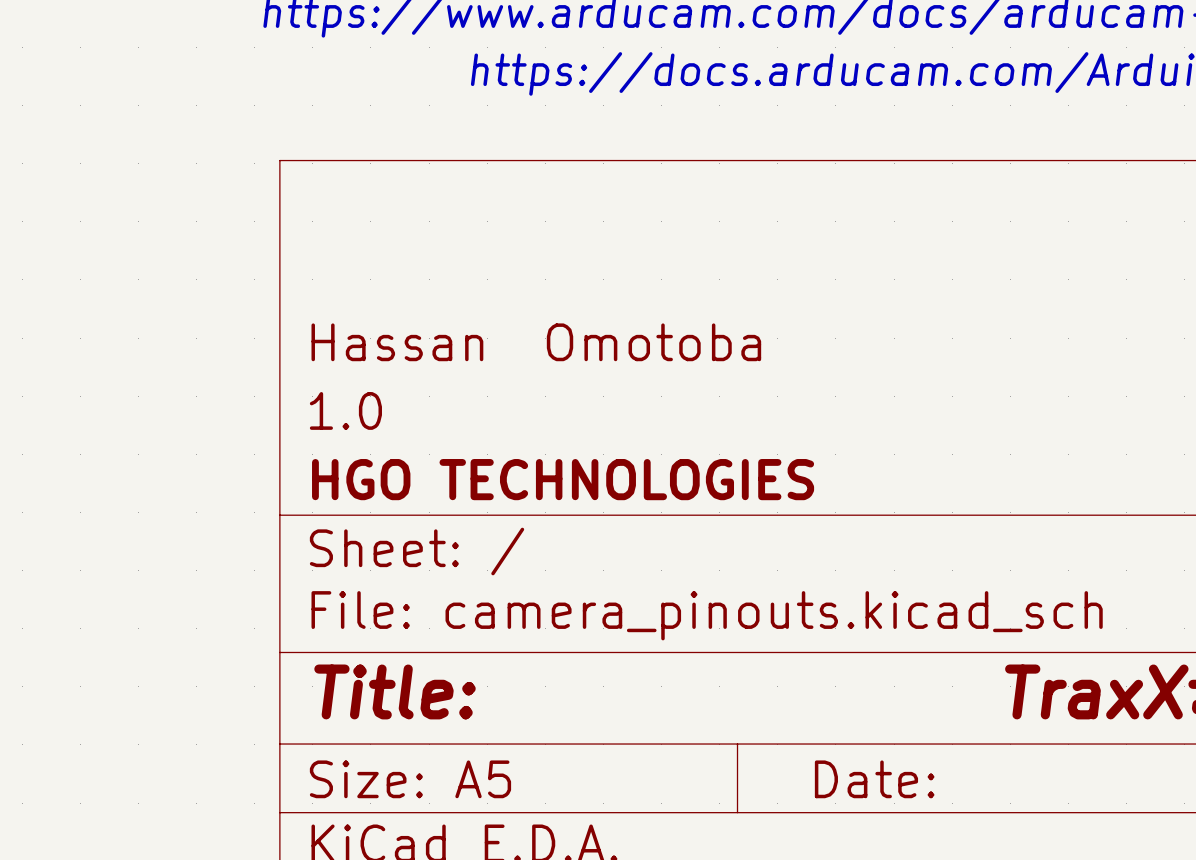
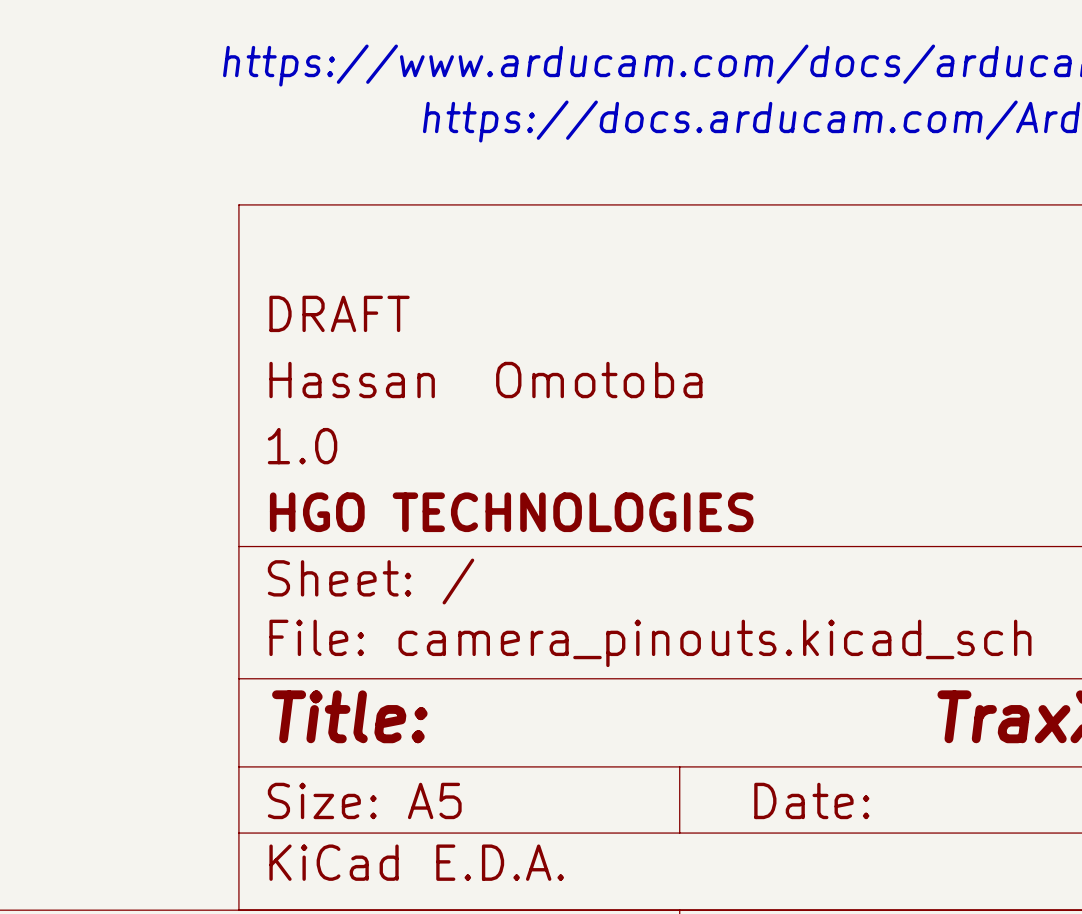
title block: none -> DRAFT (339, 313)

